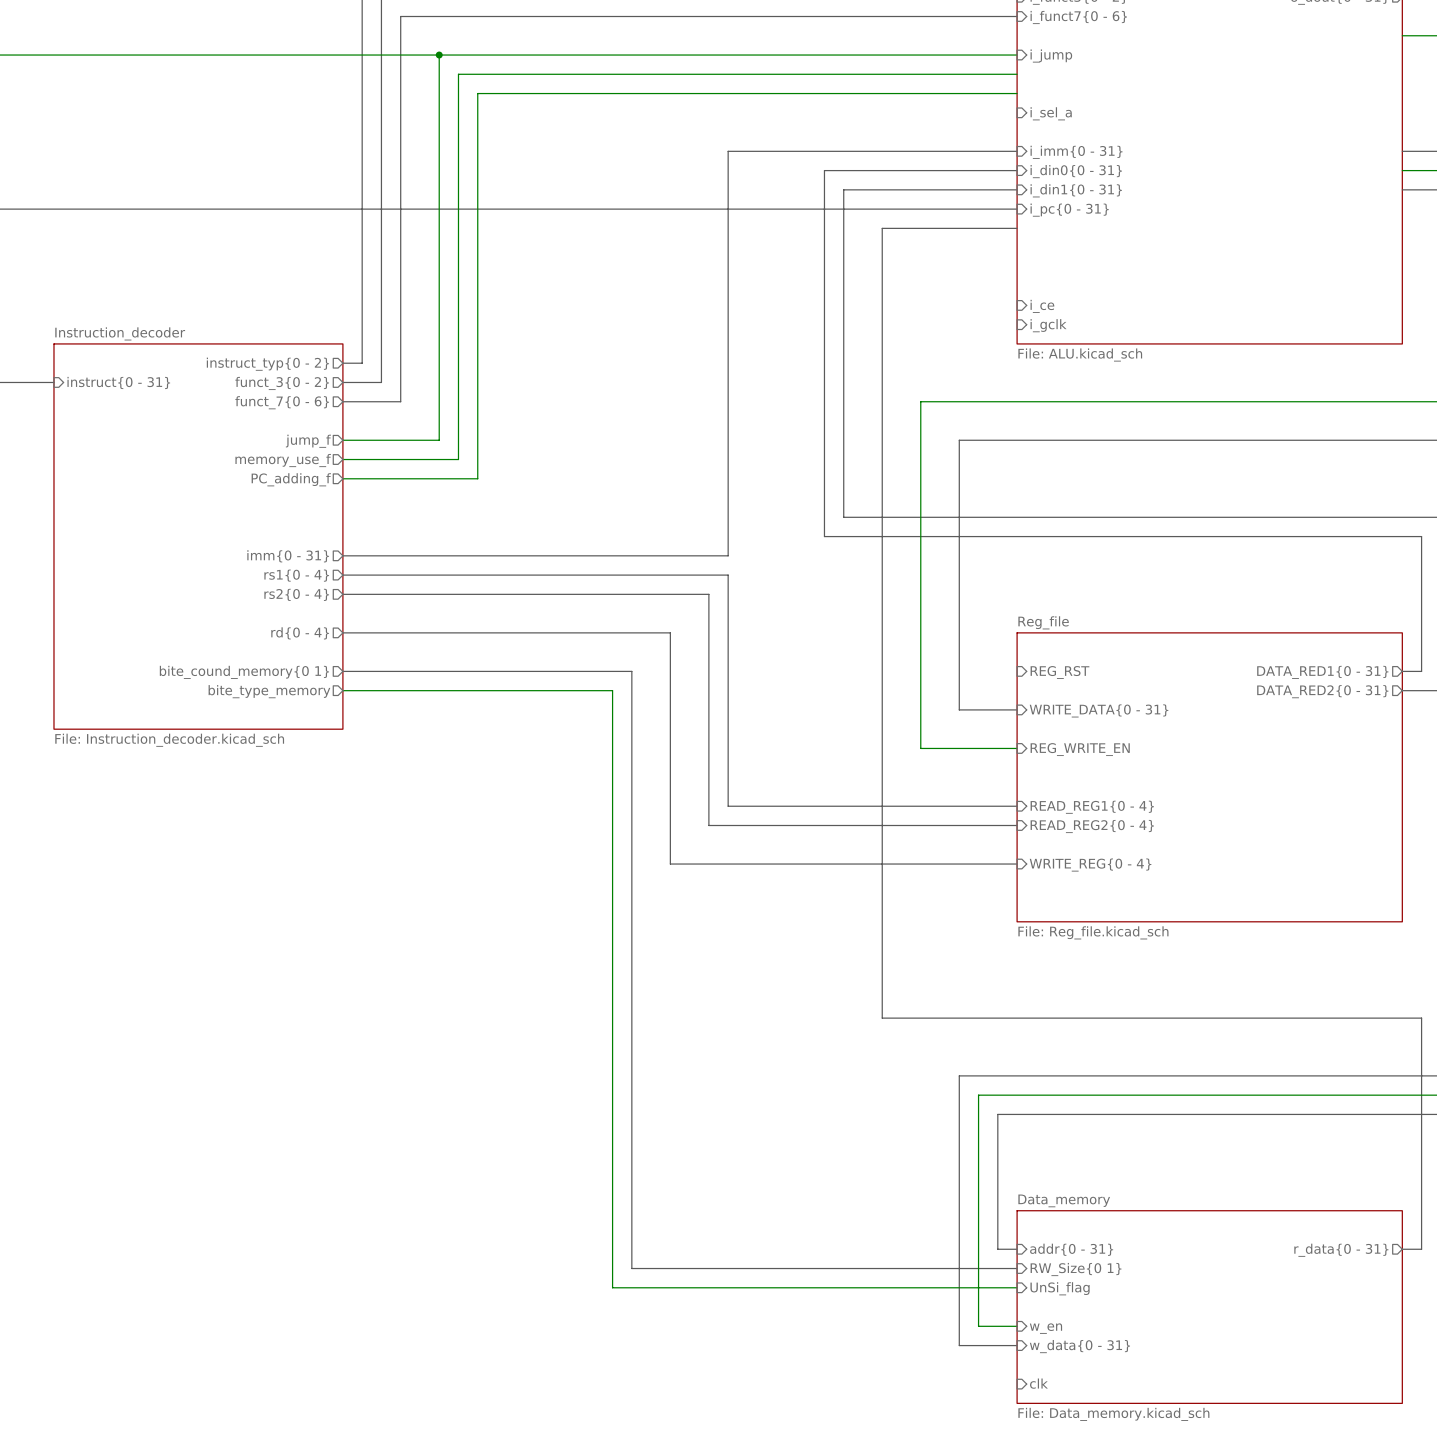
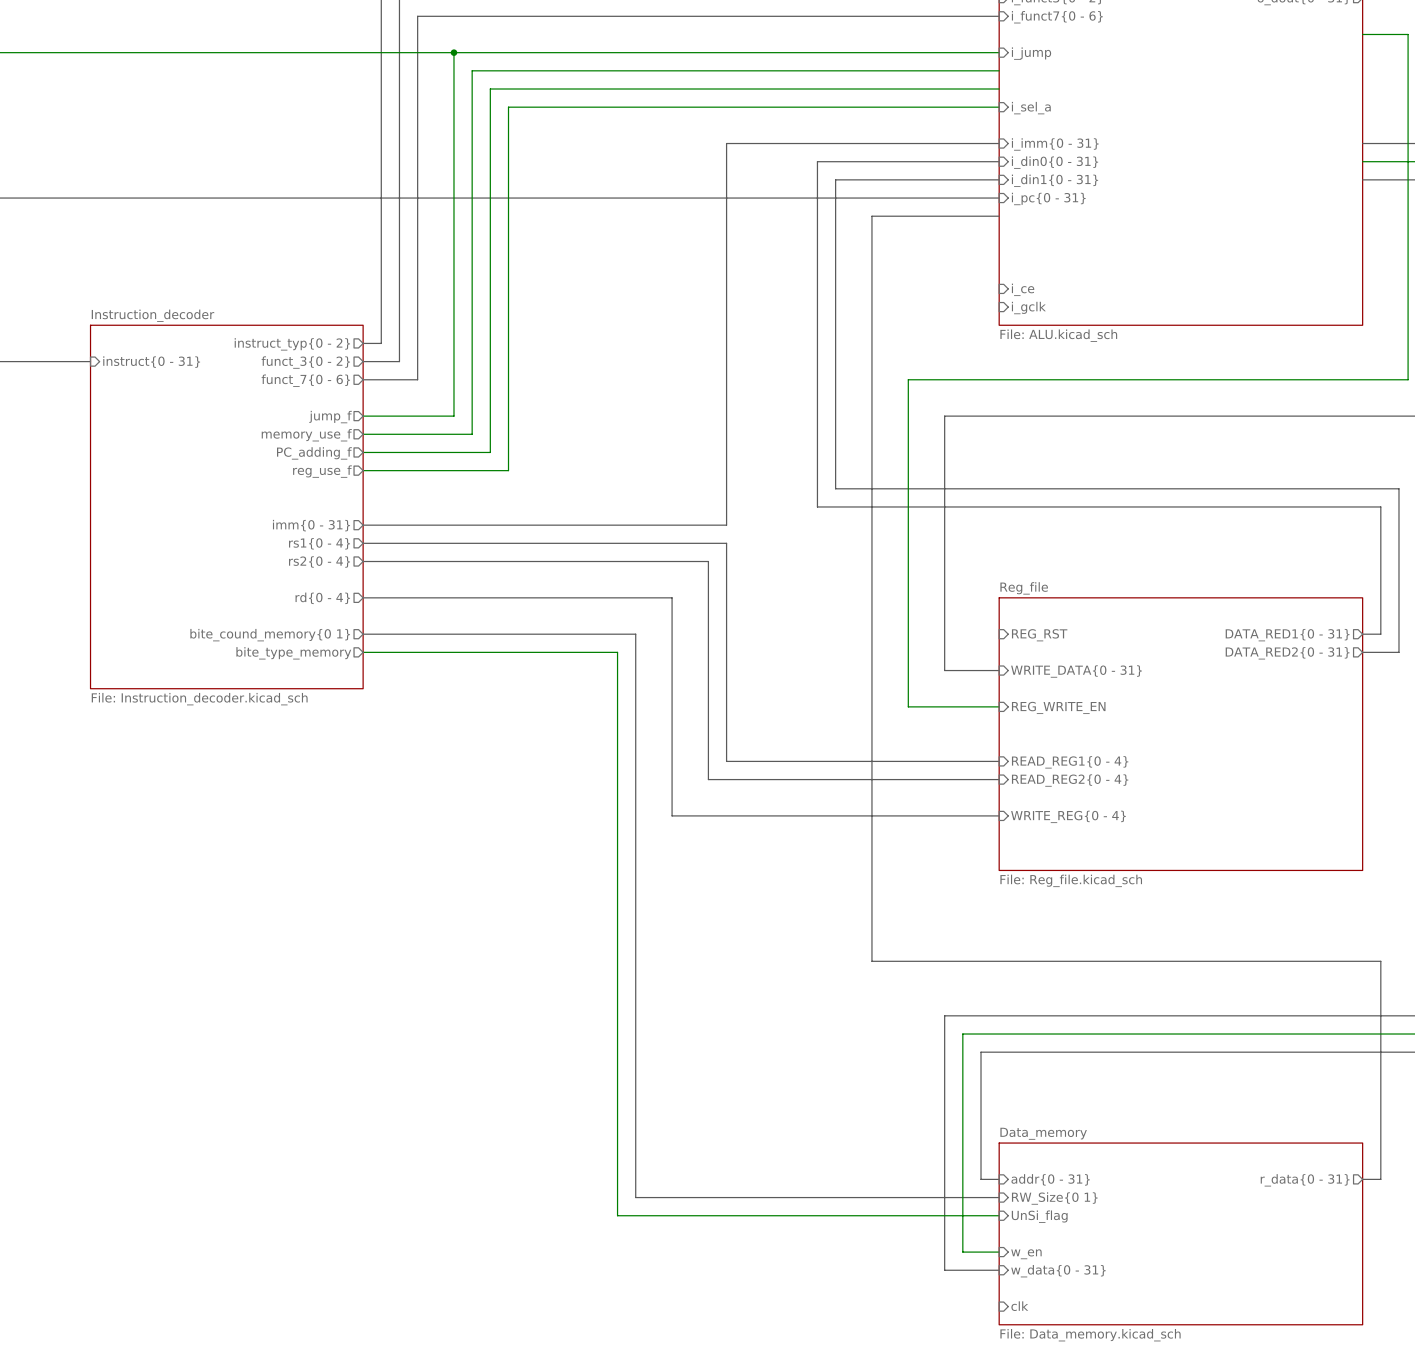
wire: none -> (999, 107) (508, 107) (508, 470) (363, 470)
sheet pin: none -> reg_use_f (322, 471)

